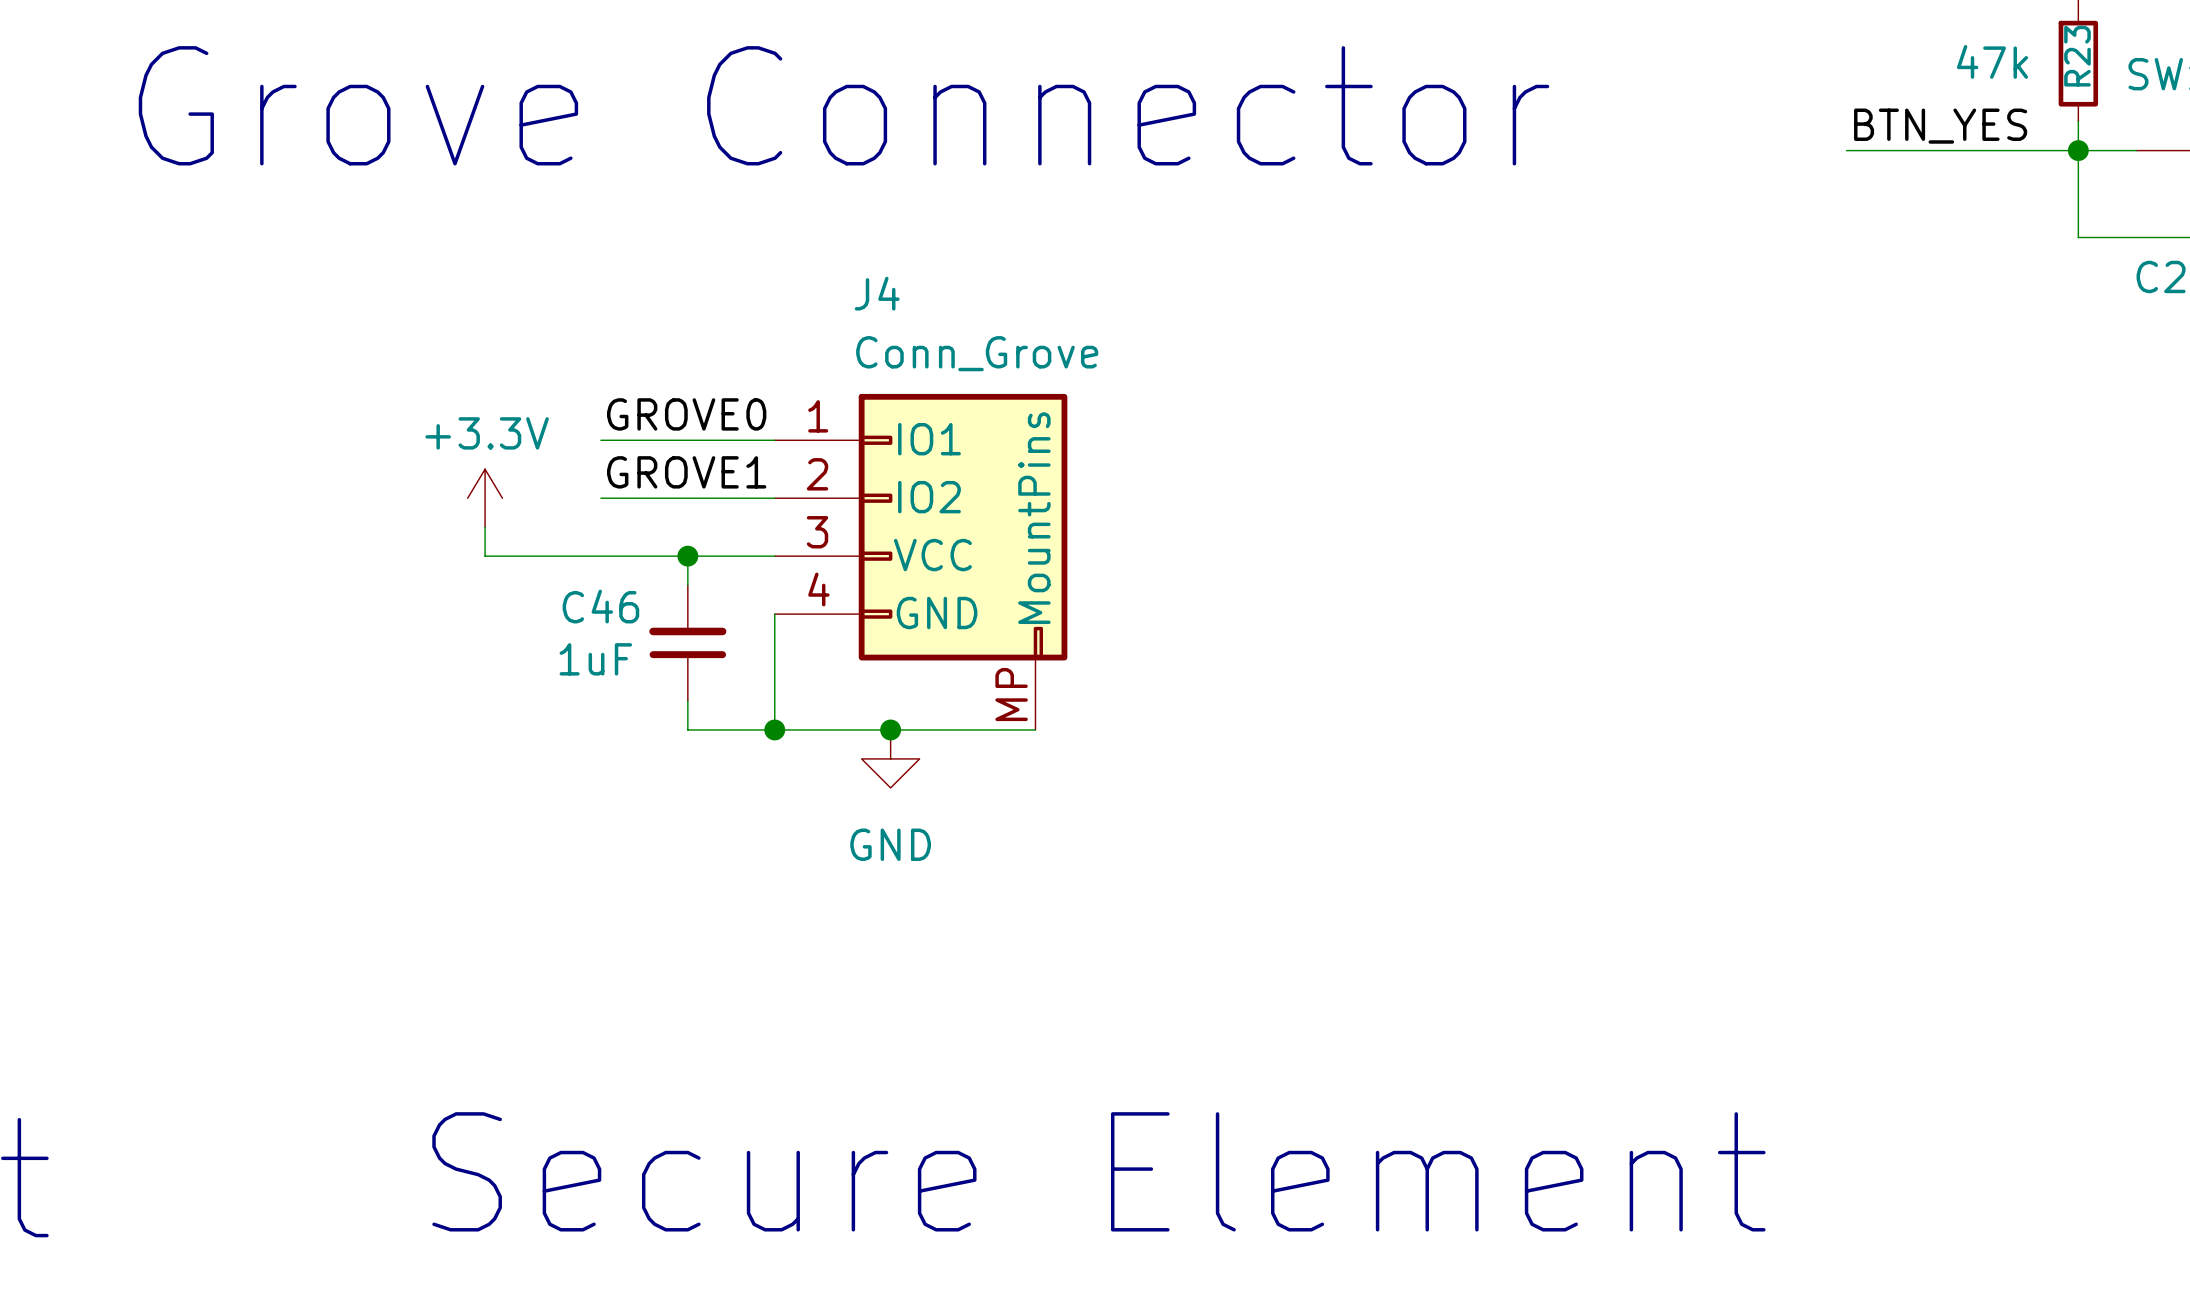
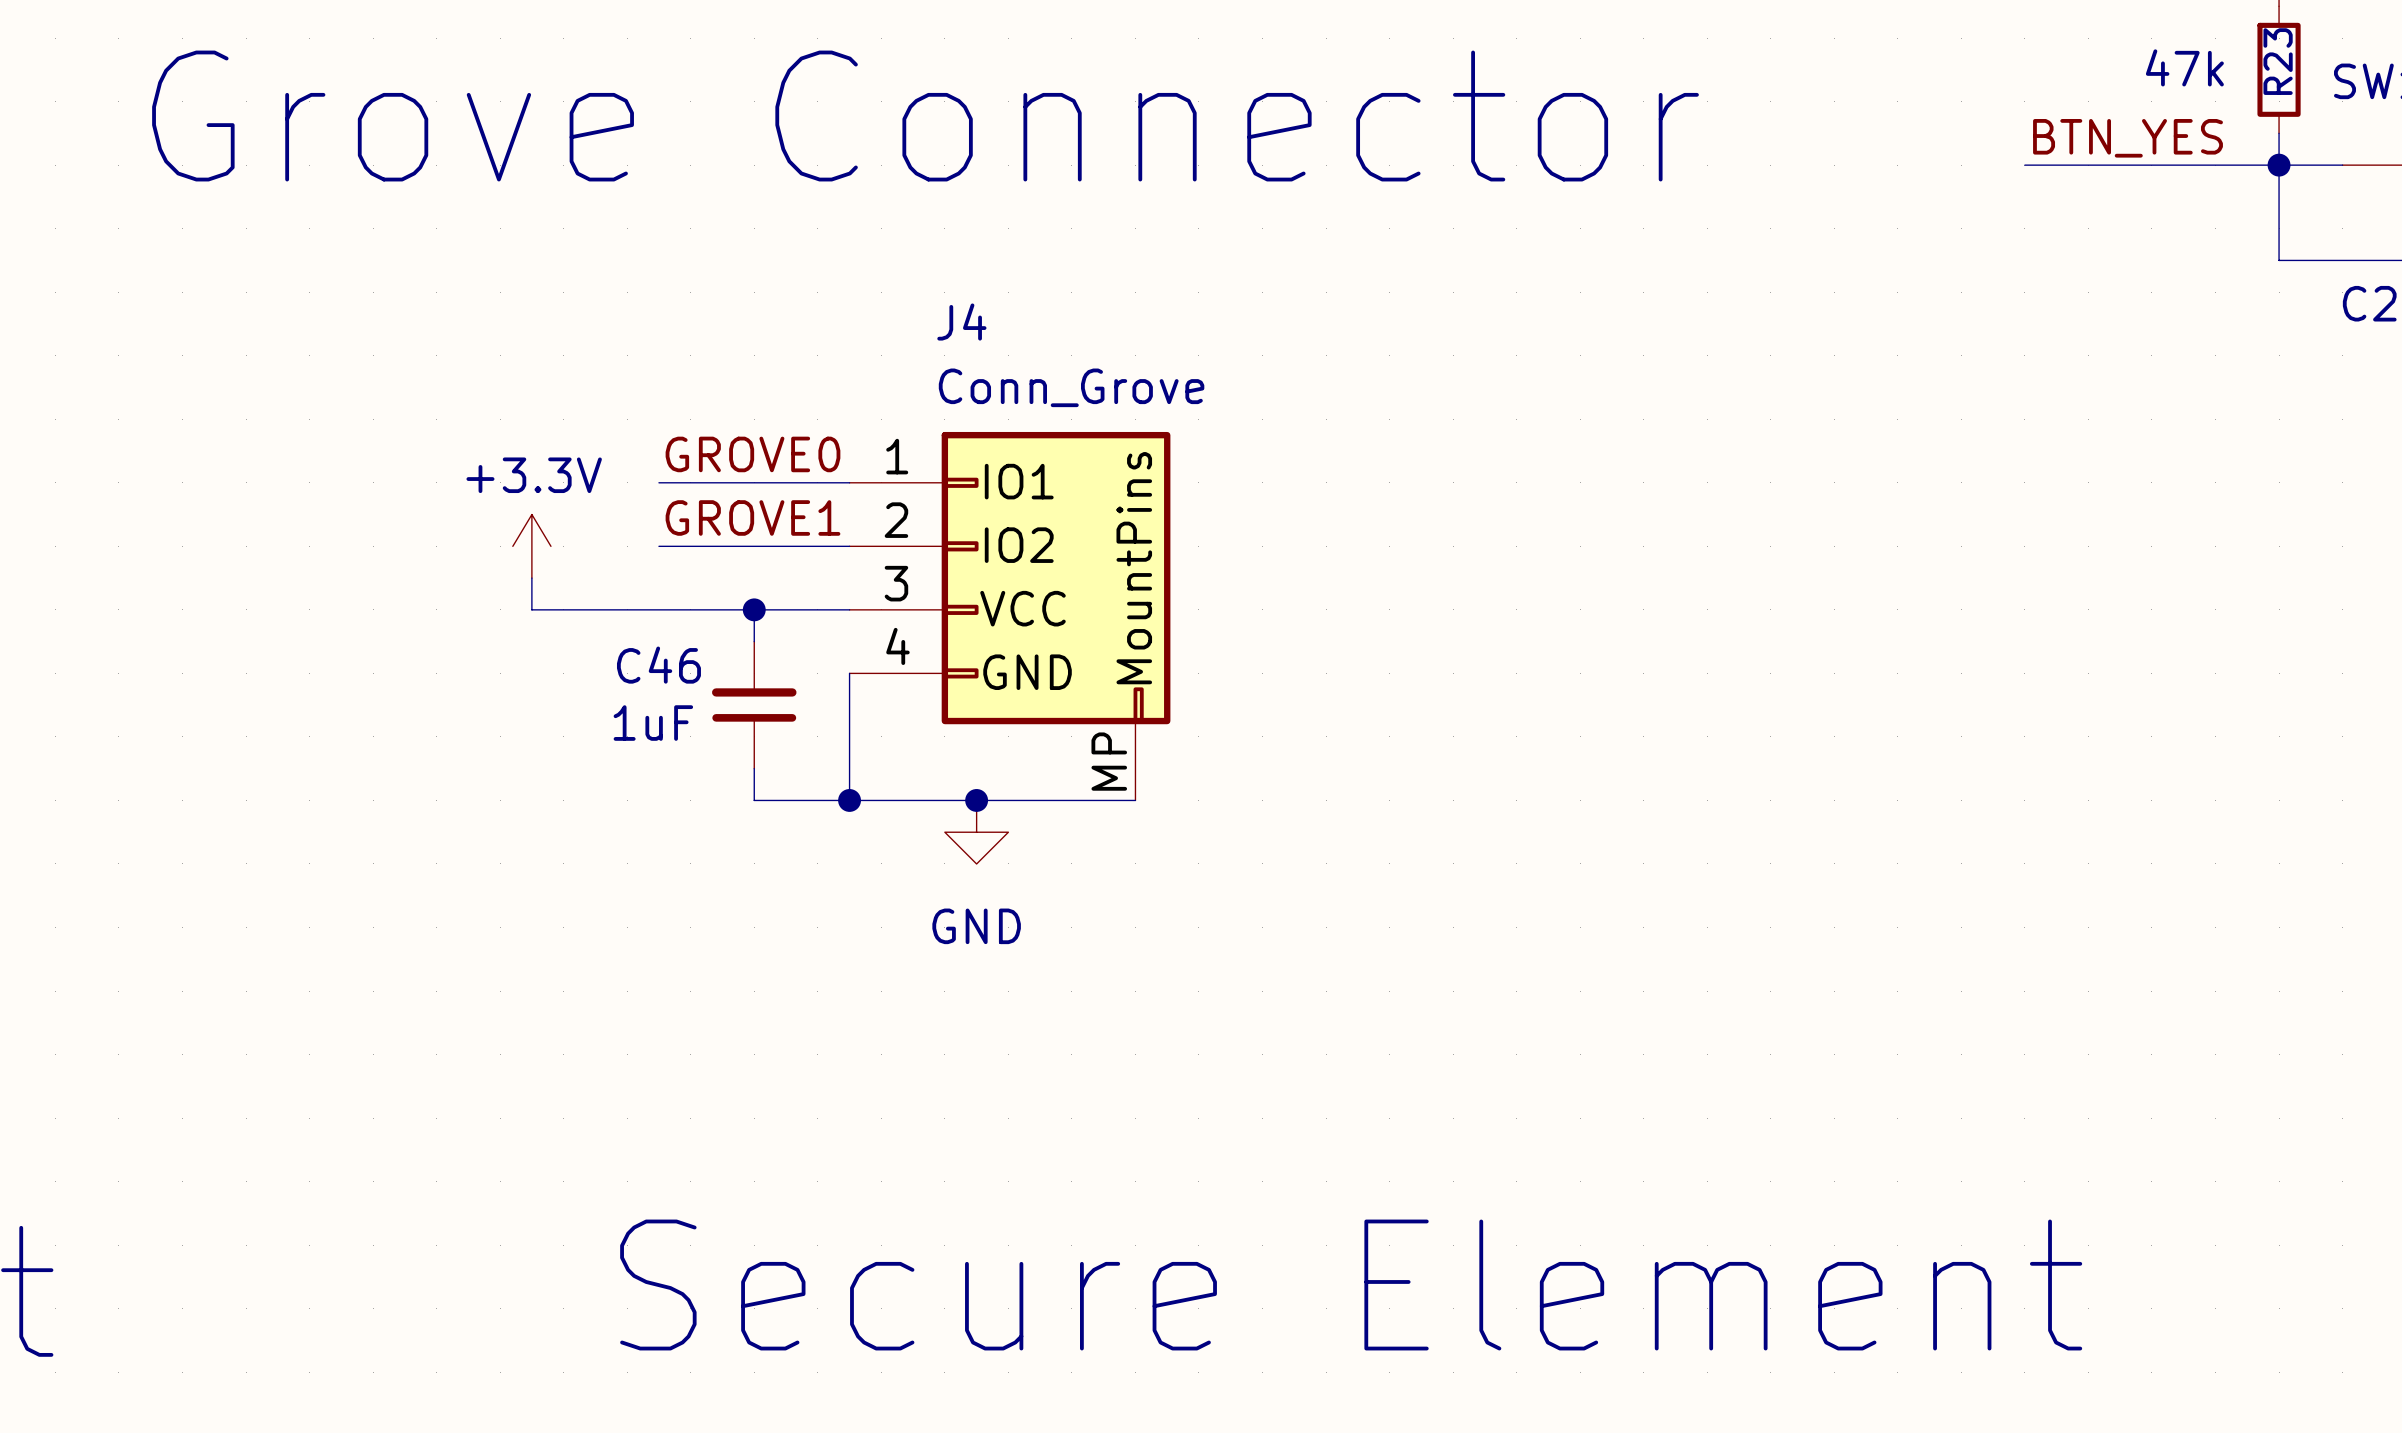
text position: Secure Element (1098, 1171) -> Secure Element (1351, 1285)

